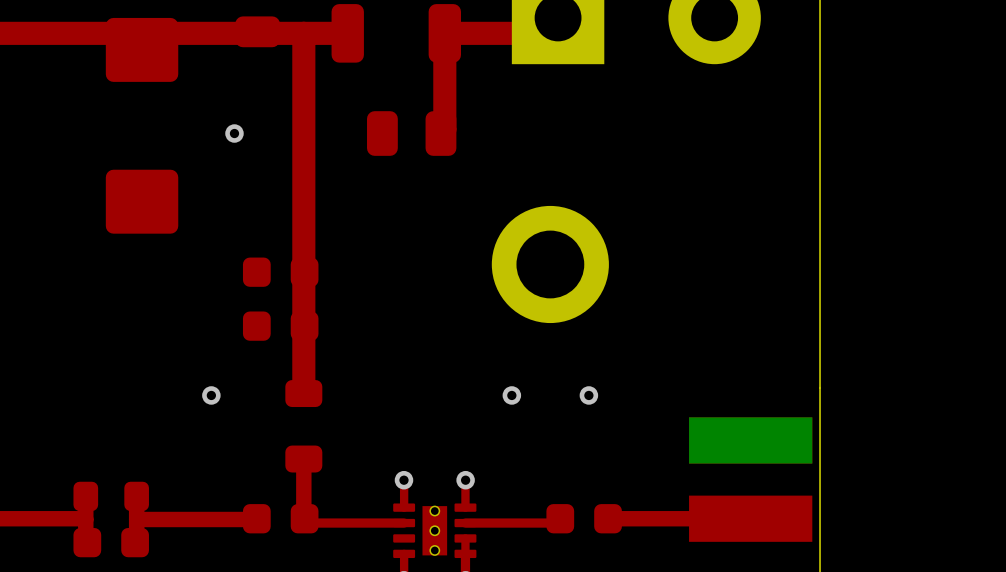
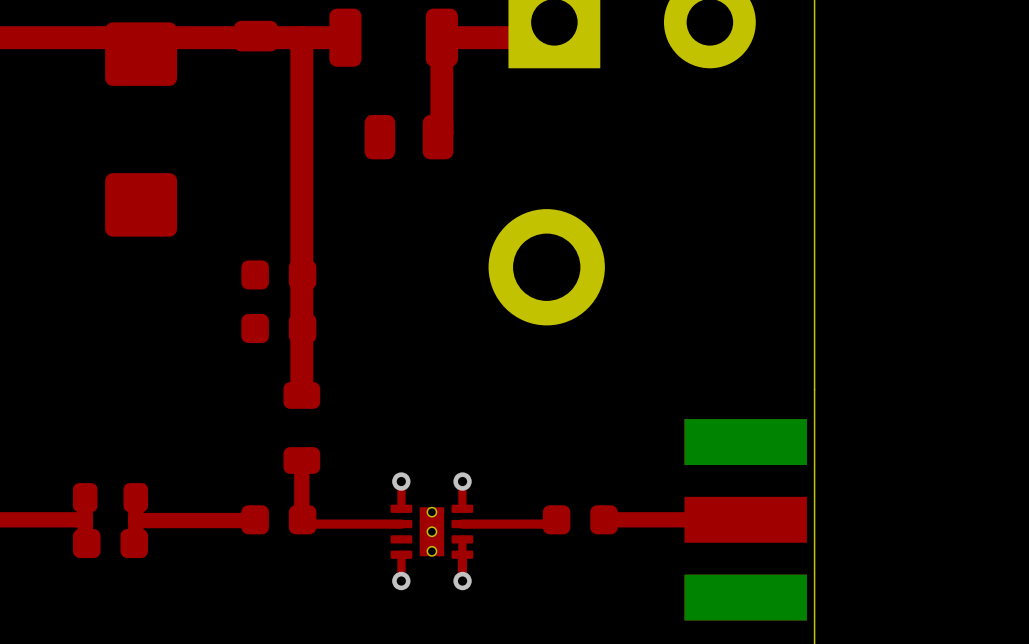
via: (234, 133) -> none
via: (211, 395) -> none
via: (511, 395) -> none
via: (588, 395) -> none

